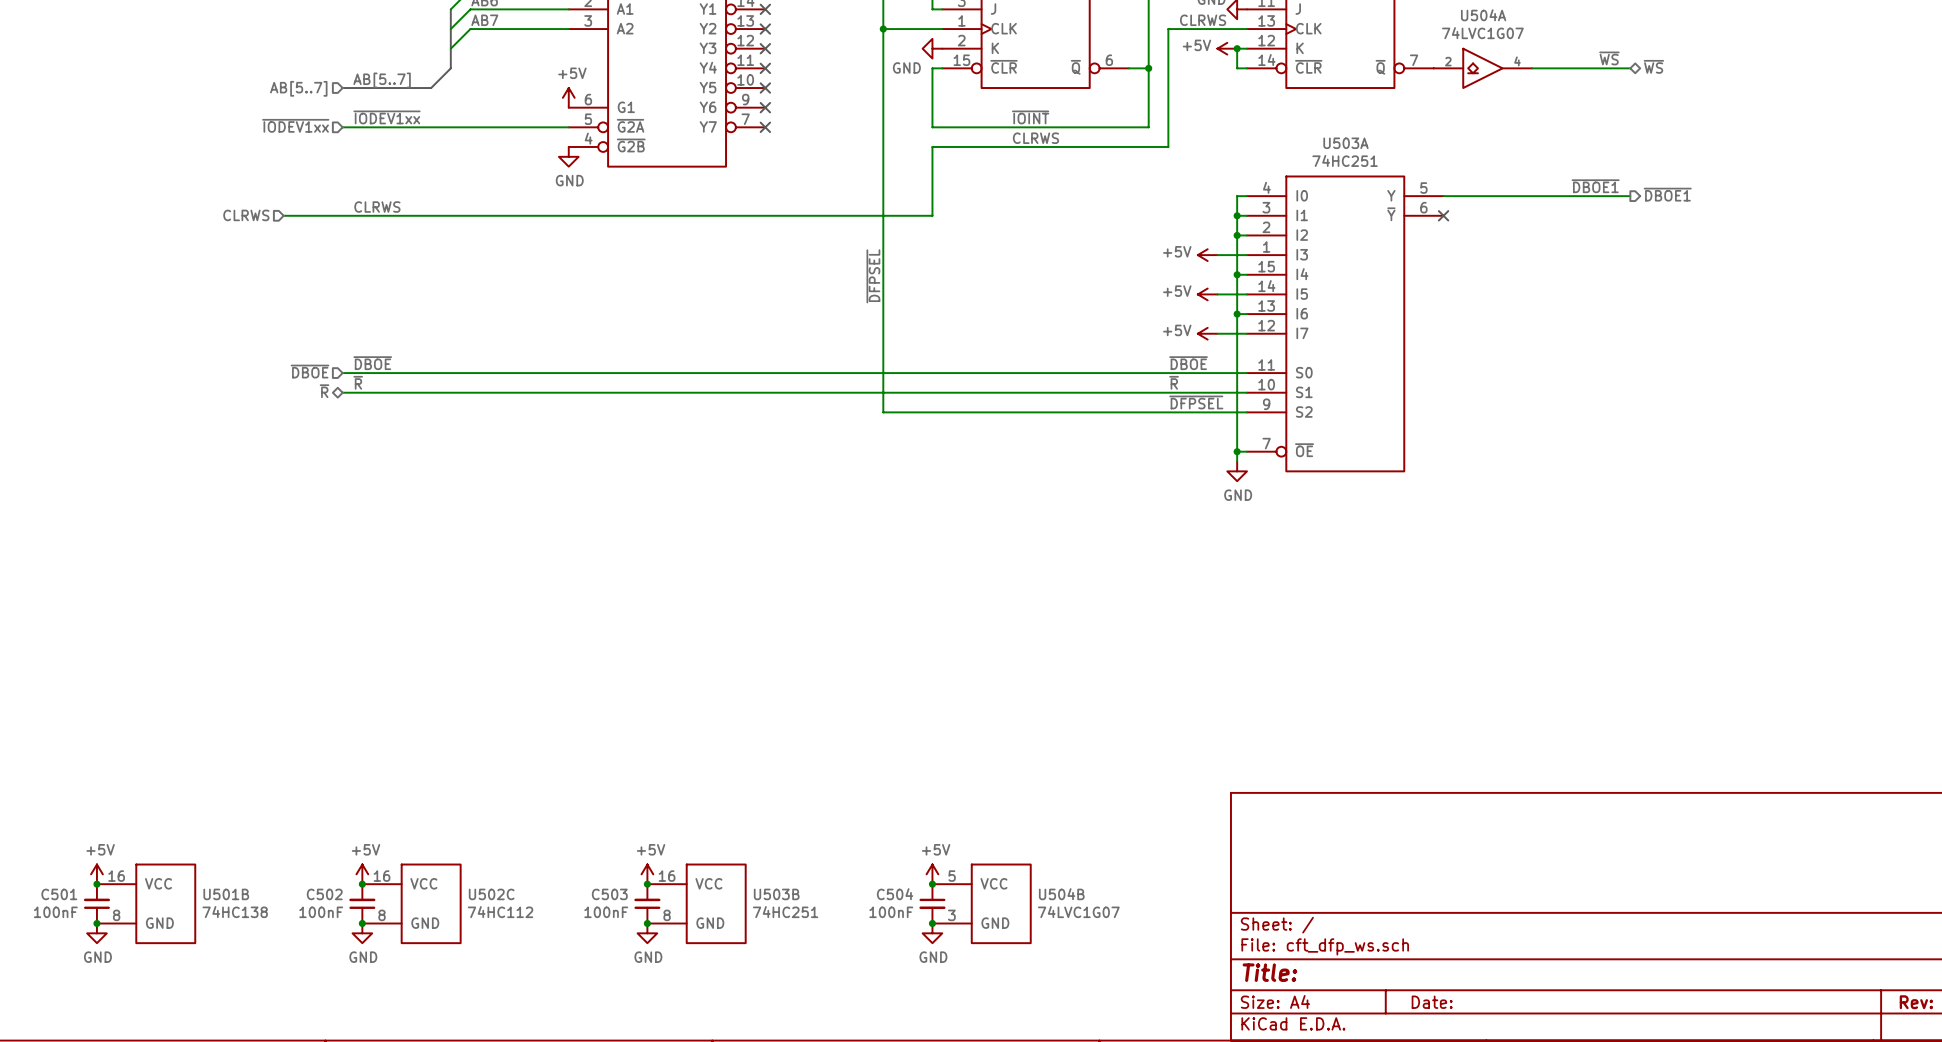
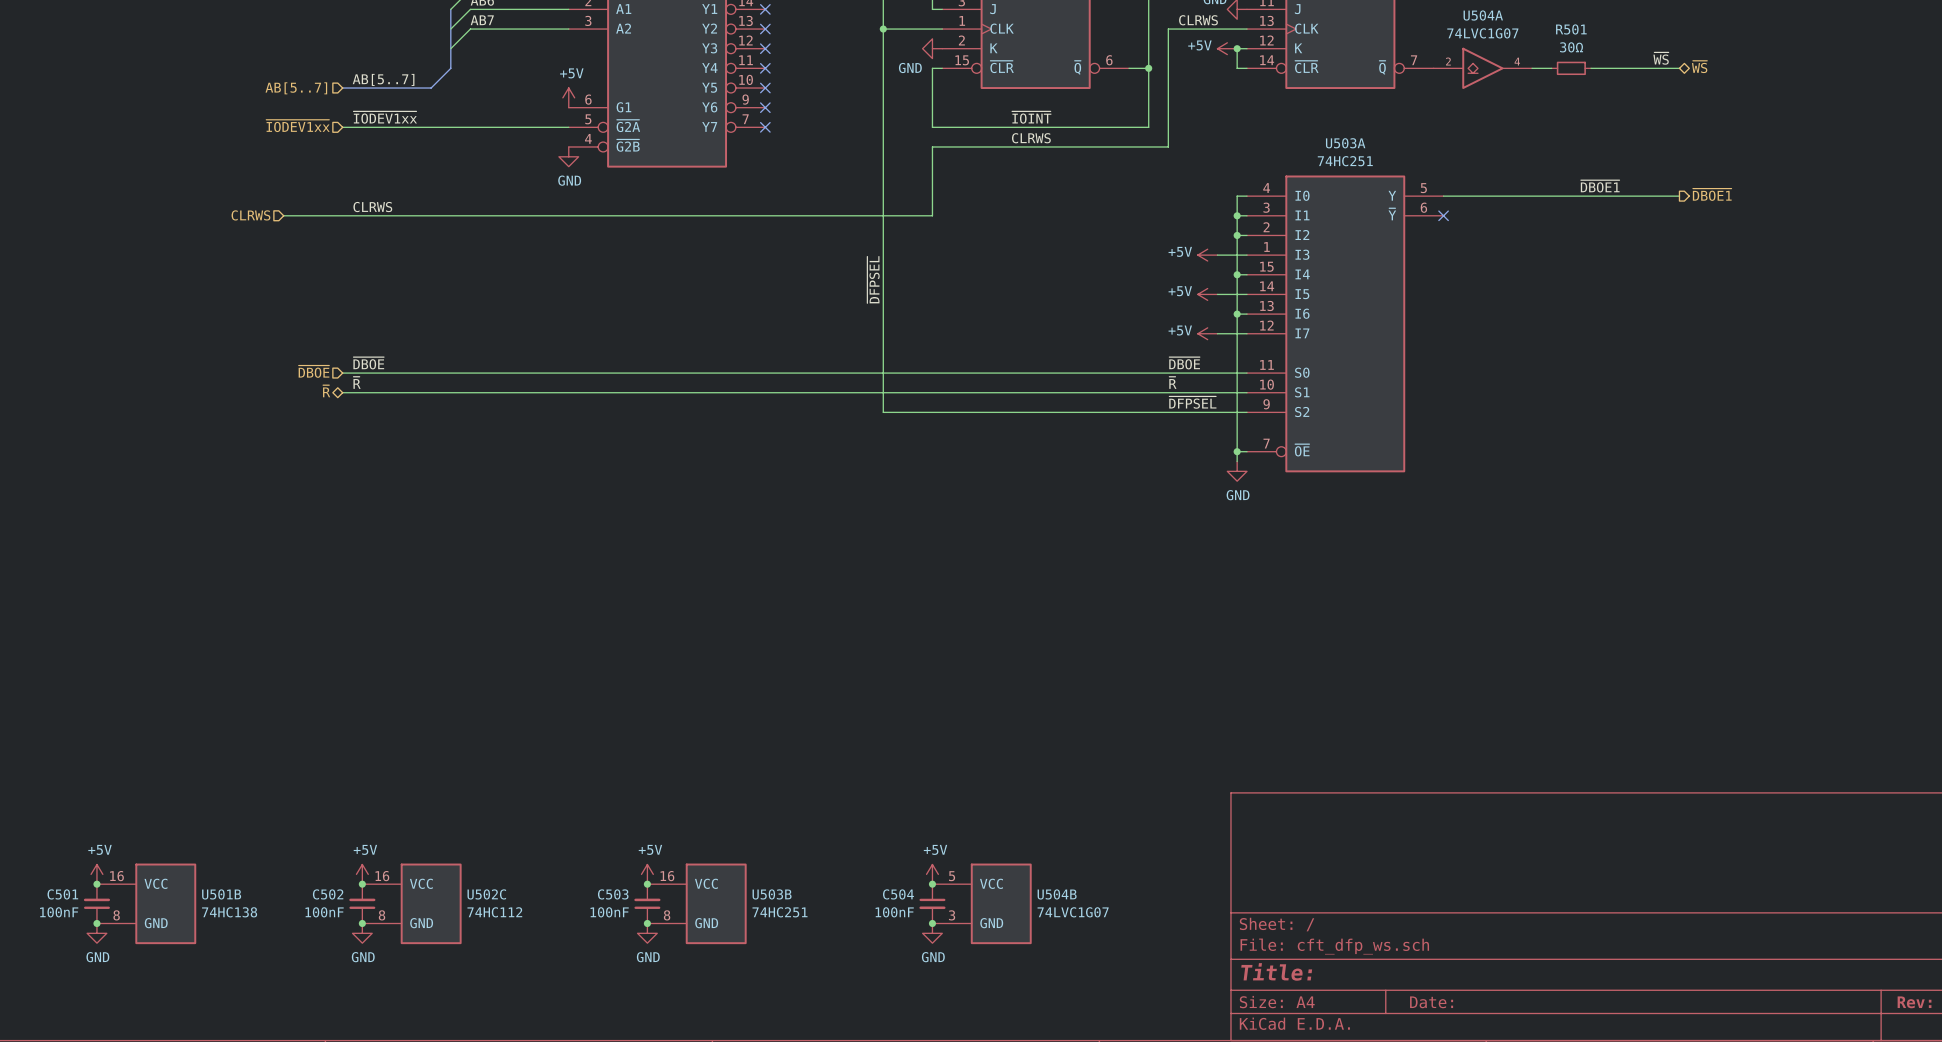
label position: ~{WS} (1609, 58) -> ~{WS} (1661, 58)
hierarchical label position: ~{WS} (1653, 66) -> ~{WS} (1699, 66)
wire: (1551, 68) (1591, 68) -> none
R501: none -> 30Ω (1571, 68)
wire: none -> (1630, 68) (1679, 68)
hierarchical label position: ~{DBOE1} (1667, 194) -> ~{DBOE1} (1712, 194)
wire: none -> (1630, 196) (1679, 196)

